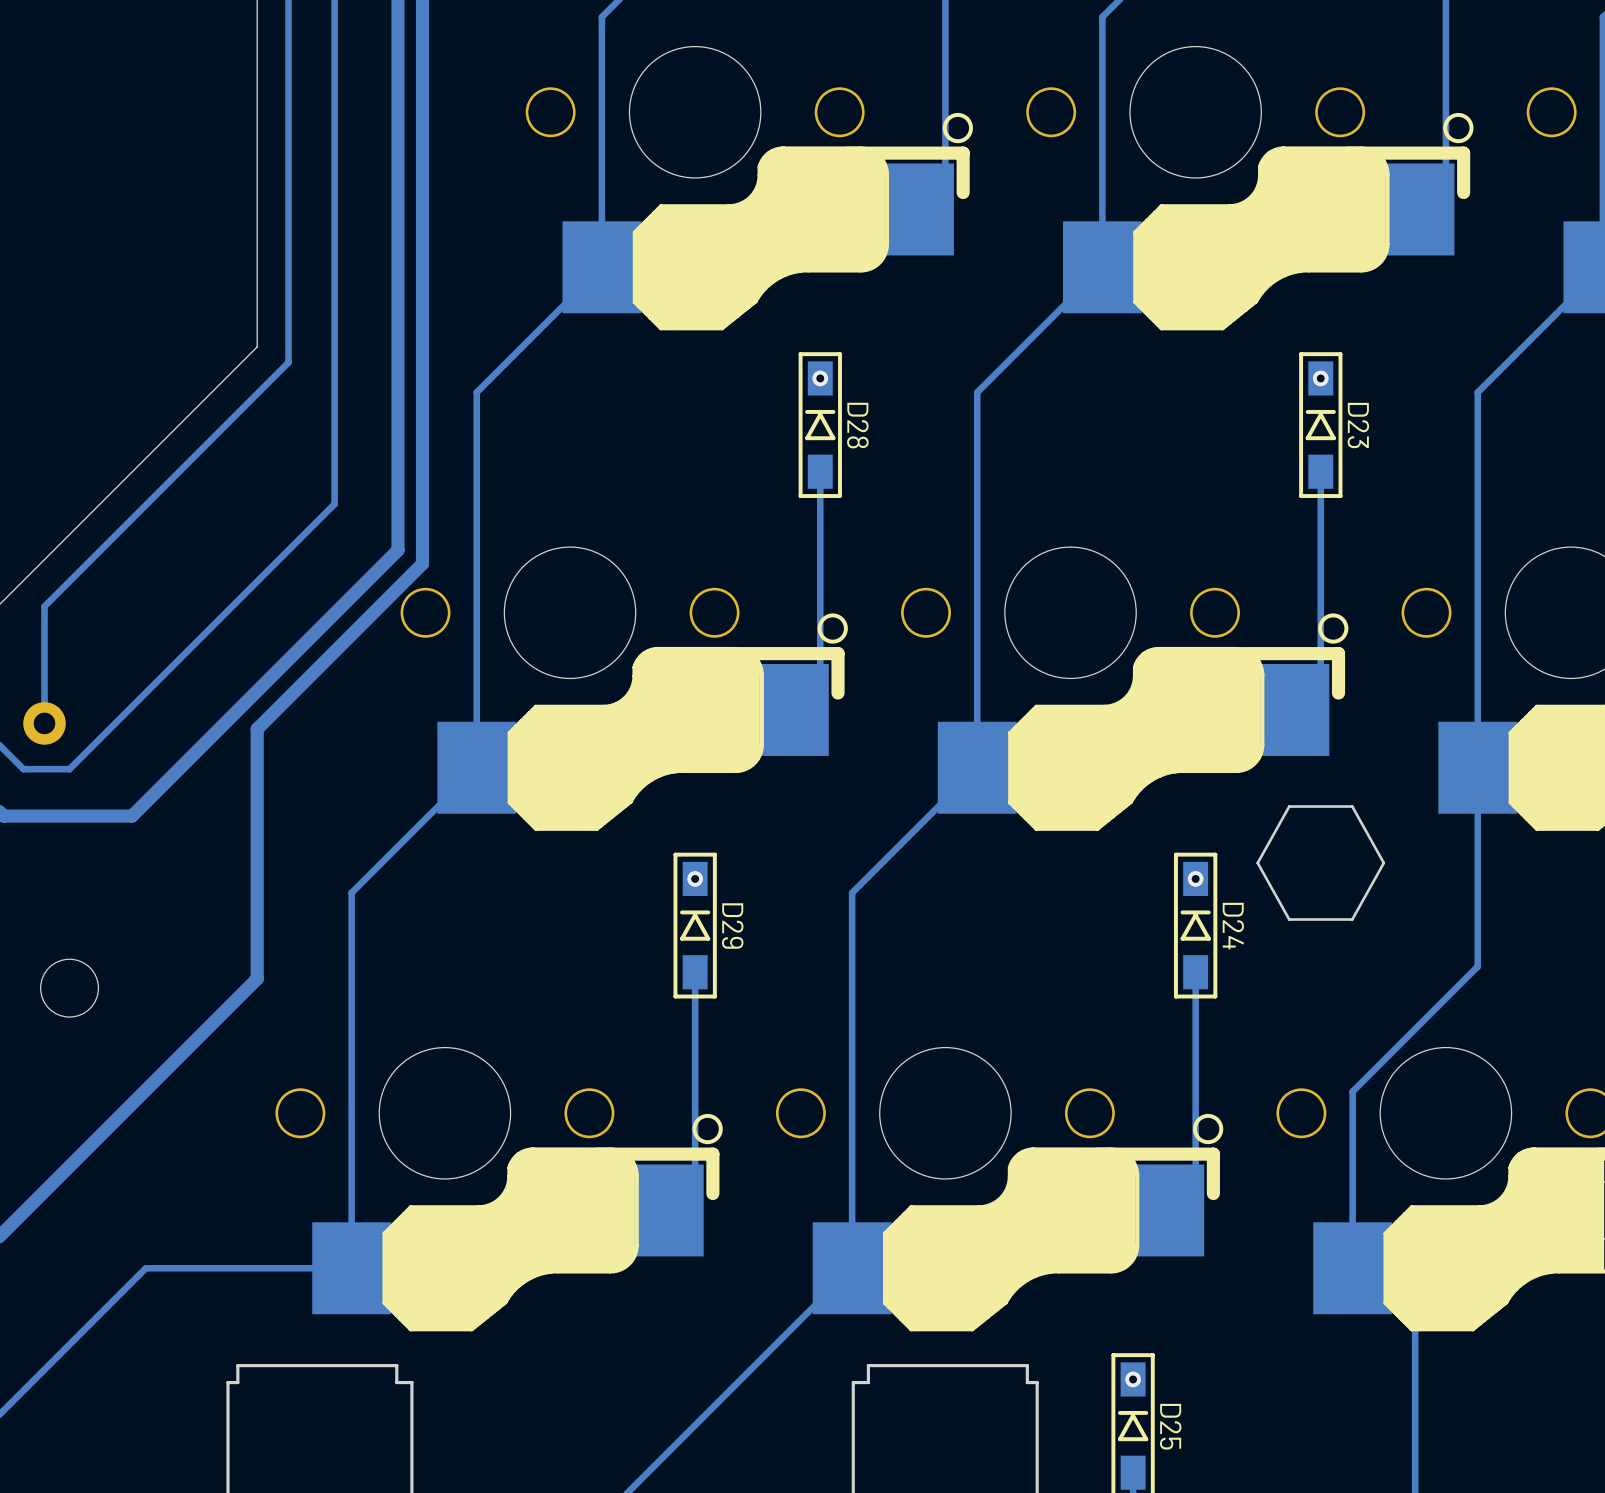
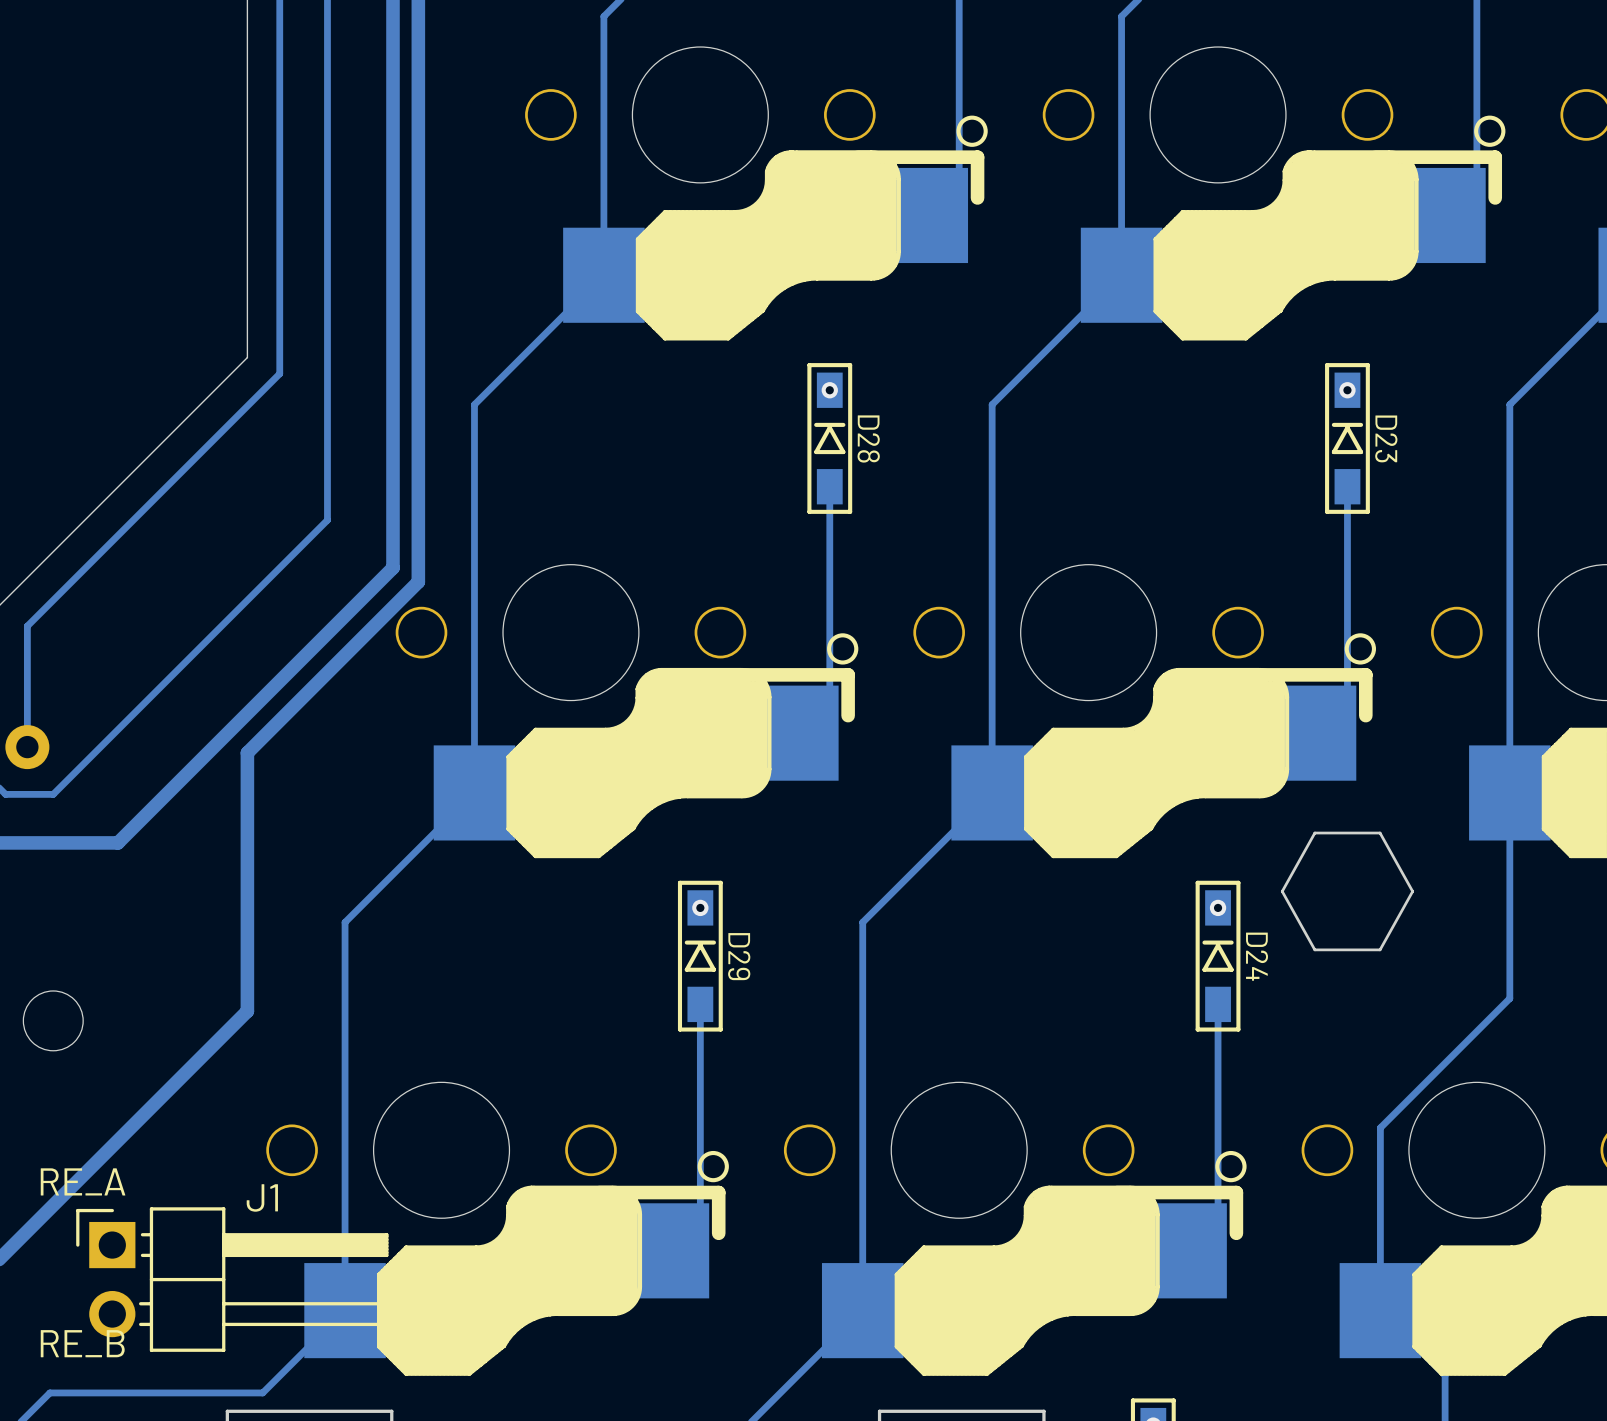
text: none -> RE_A (83, 1181)
J1: none -> (232, 1279)
track: (351, 1268) (145, 1268) (66, 1347) -> (345, 1310) (262, 1392) (49, 1392)
text: none -> RE_B (82, 1343)

